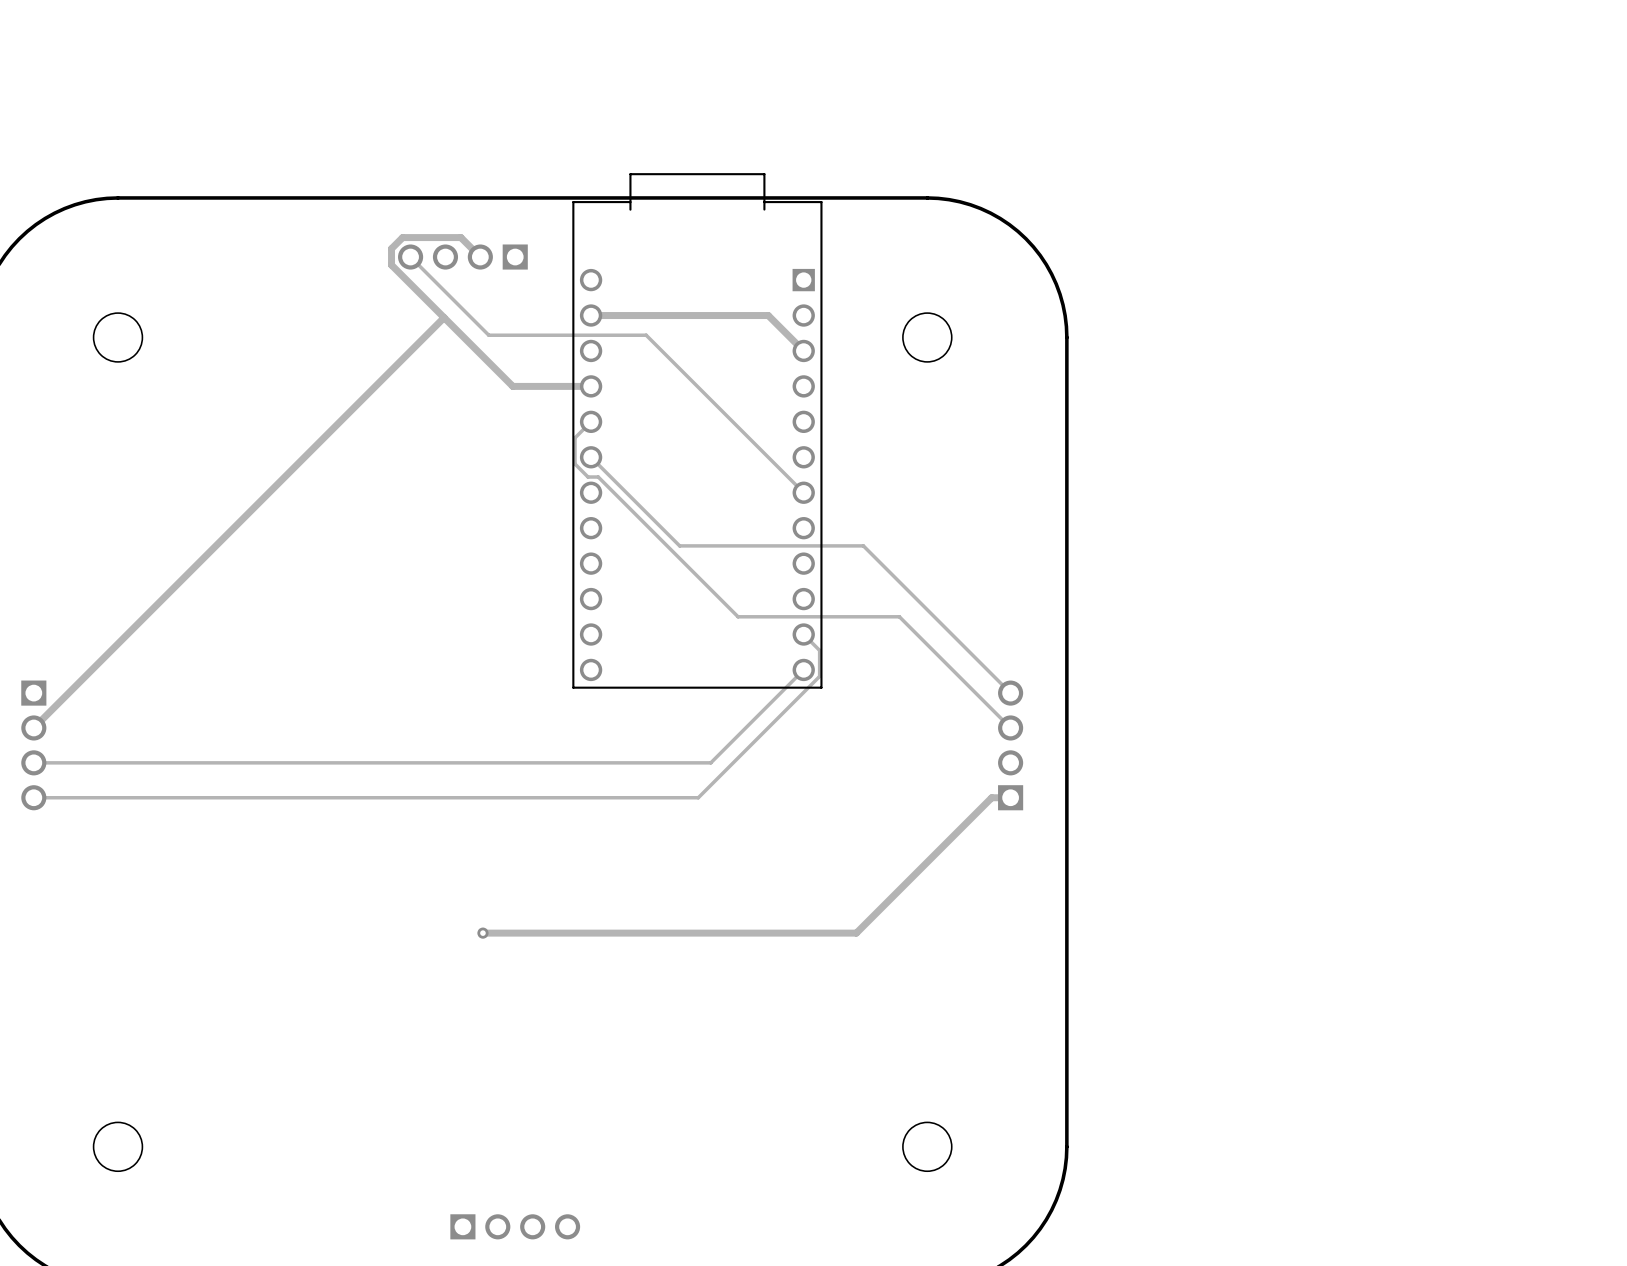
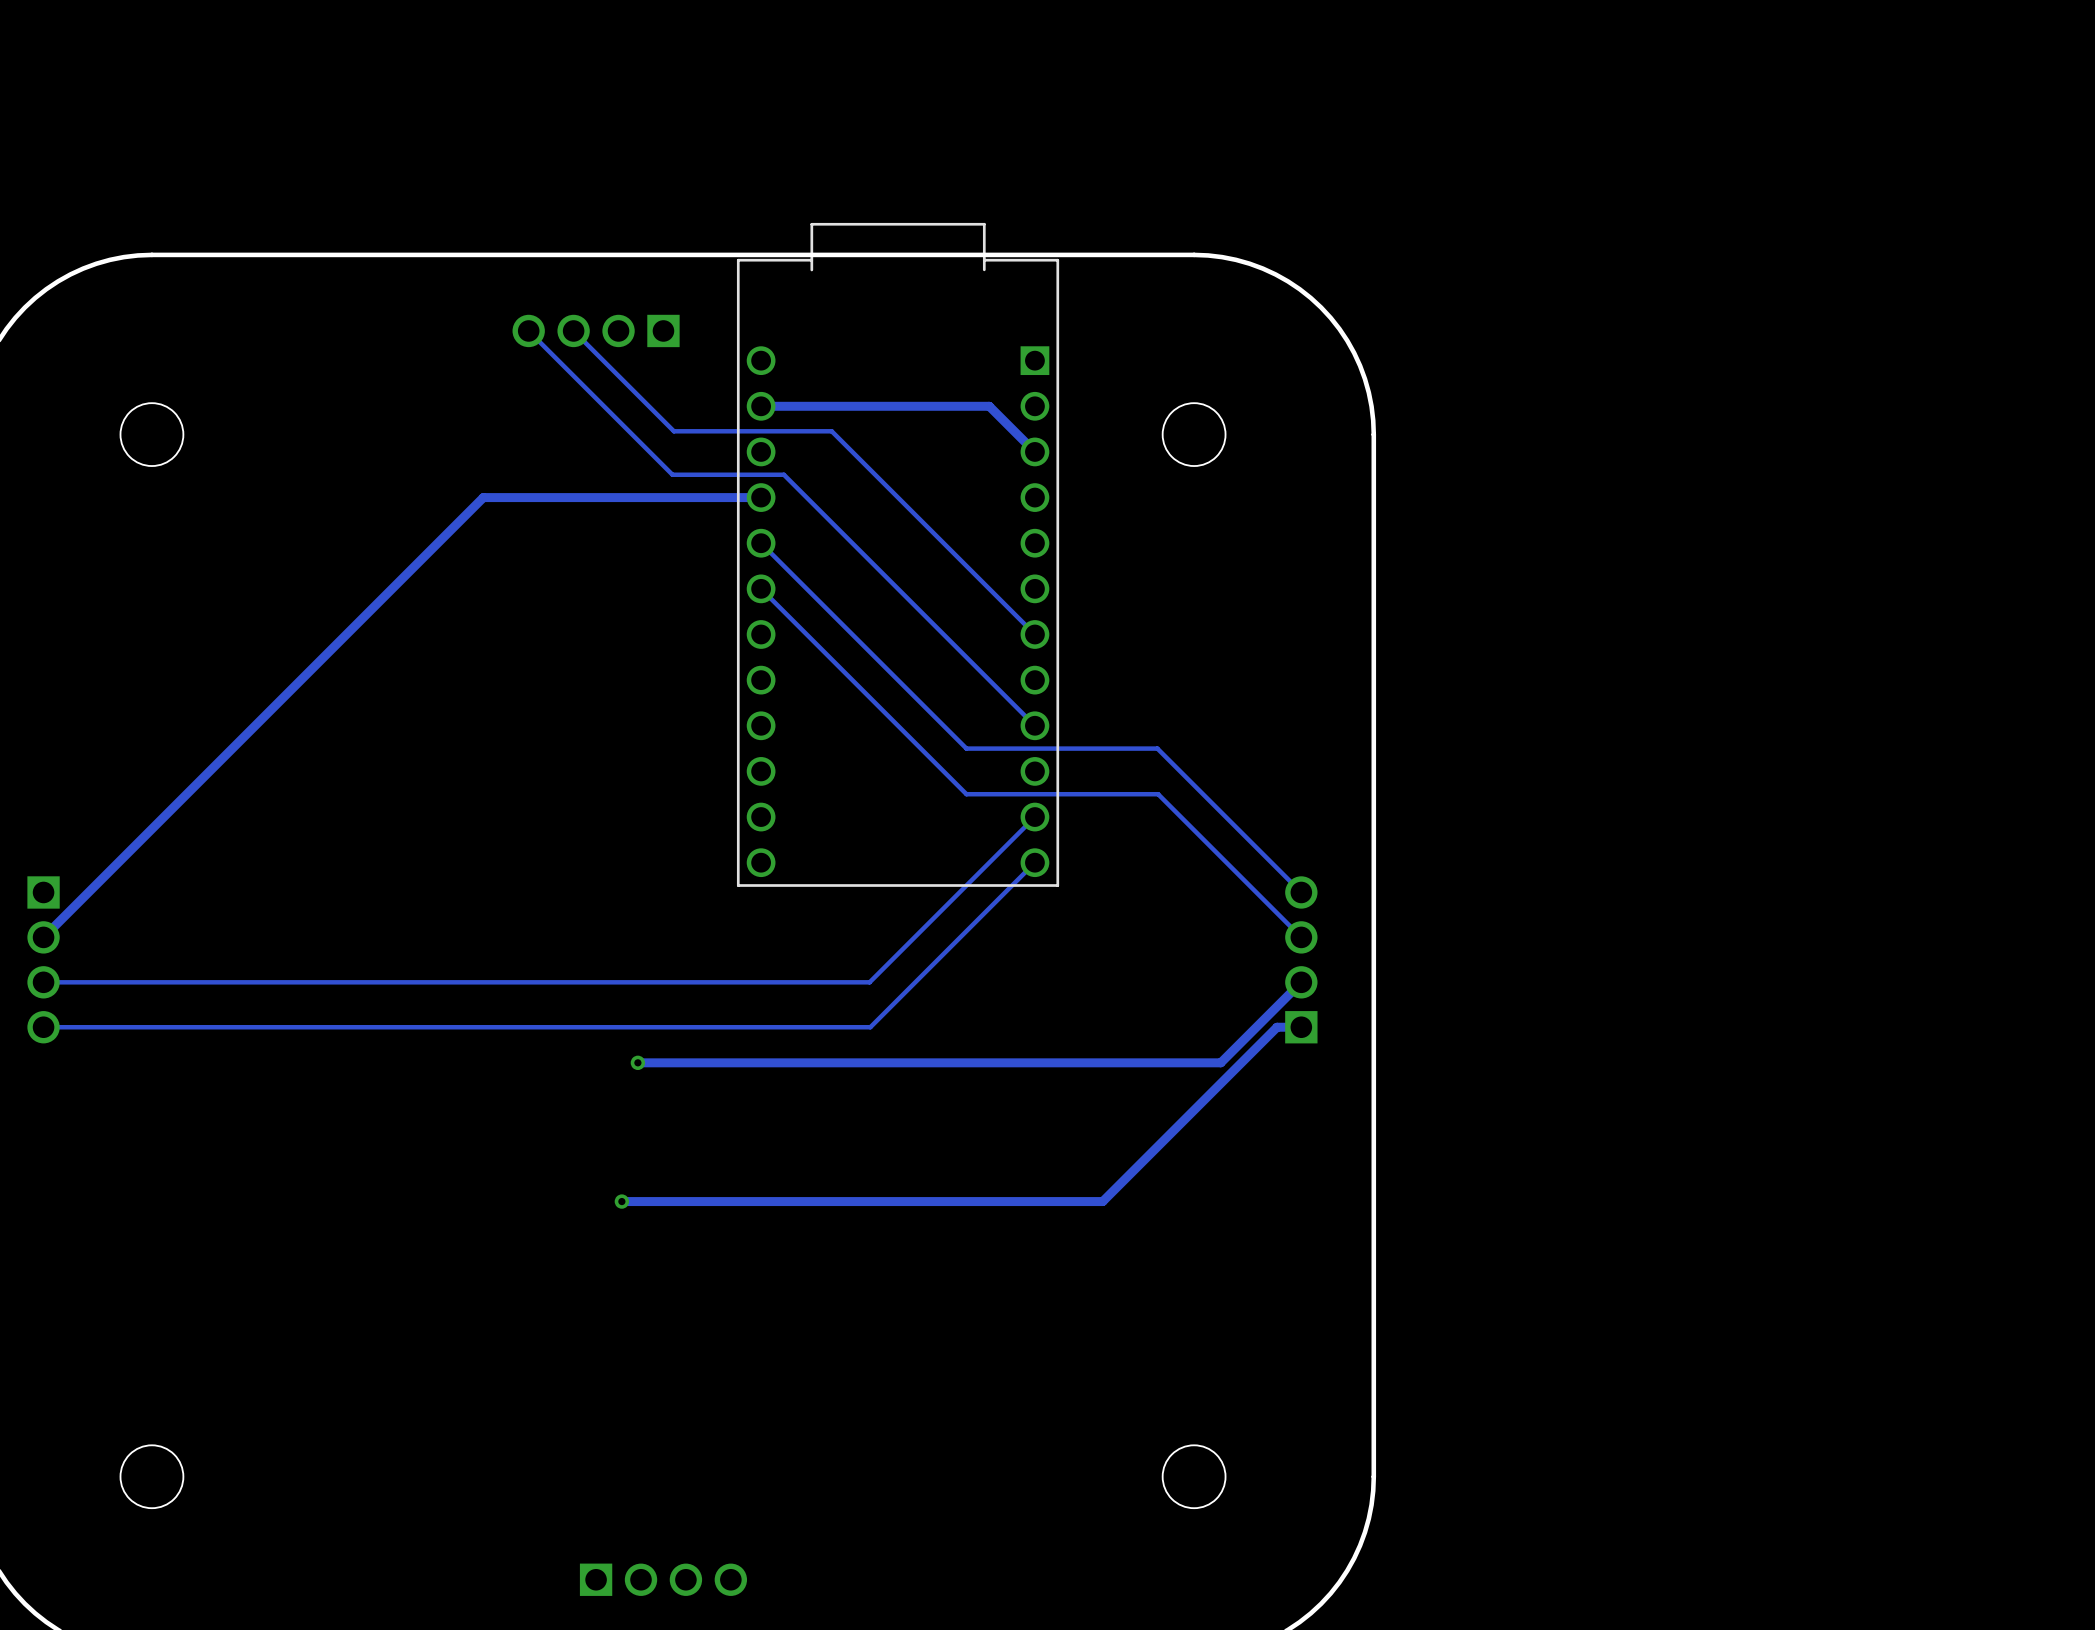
track: (480, 257) (460, 237) (402, 237) (391, 248) (391, 265) (512, 386) -> none
track: (444, 317) (375, 386) -> (660, 497) (483, 497)
track: none -> (629, 431) (672, 474) (783, 474) (1034, 725)
track: (646, 335) (488, 335) -> (832, 431) (673, 431) (573, 330)
track: (591, 421) (574, 437) (574, 463) (588, 477) (598, 477) (738, 616) (750, 616) -> (875, 702) (966, 794)
track: (679, 545) (863, 545) (898, 581) -> (761, 543) (966, 748) (1157, 748)
track: (803, 634) (819, 650) (819, 676) (698, 797) (675, 797) -> (1034, 817) (869, 982)
track: (710, 762) (675, 762) -> (915, 982) (870, 1027)
track: none -> (1301, 982) (1220, 1062) (637, 1062)
via: none -> (637, 1062)

